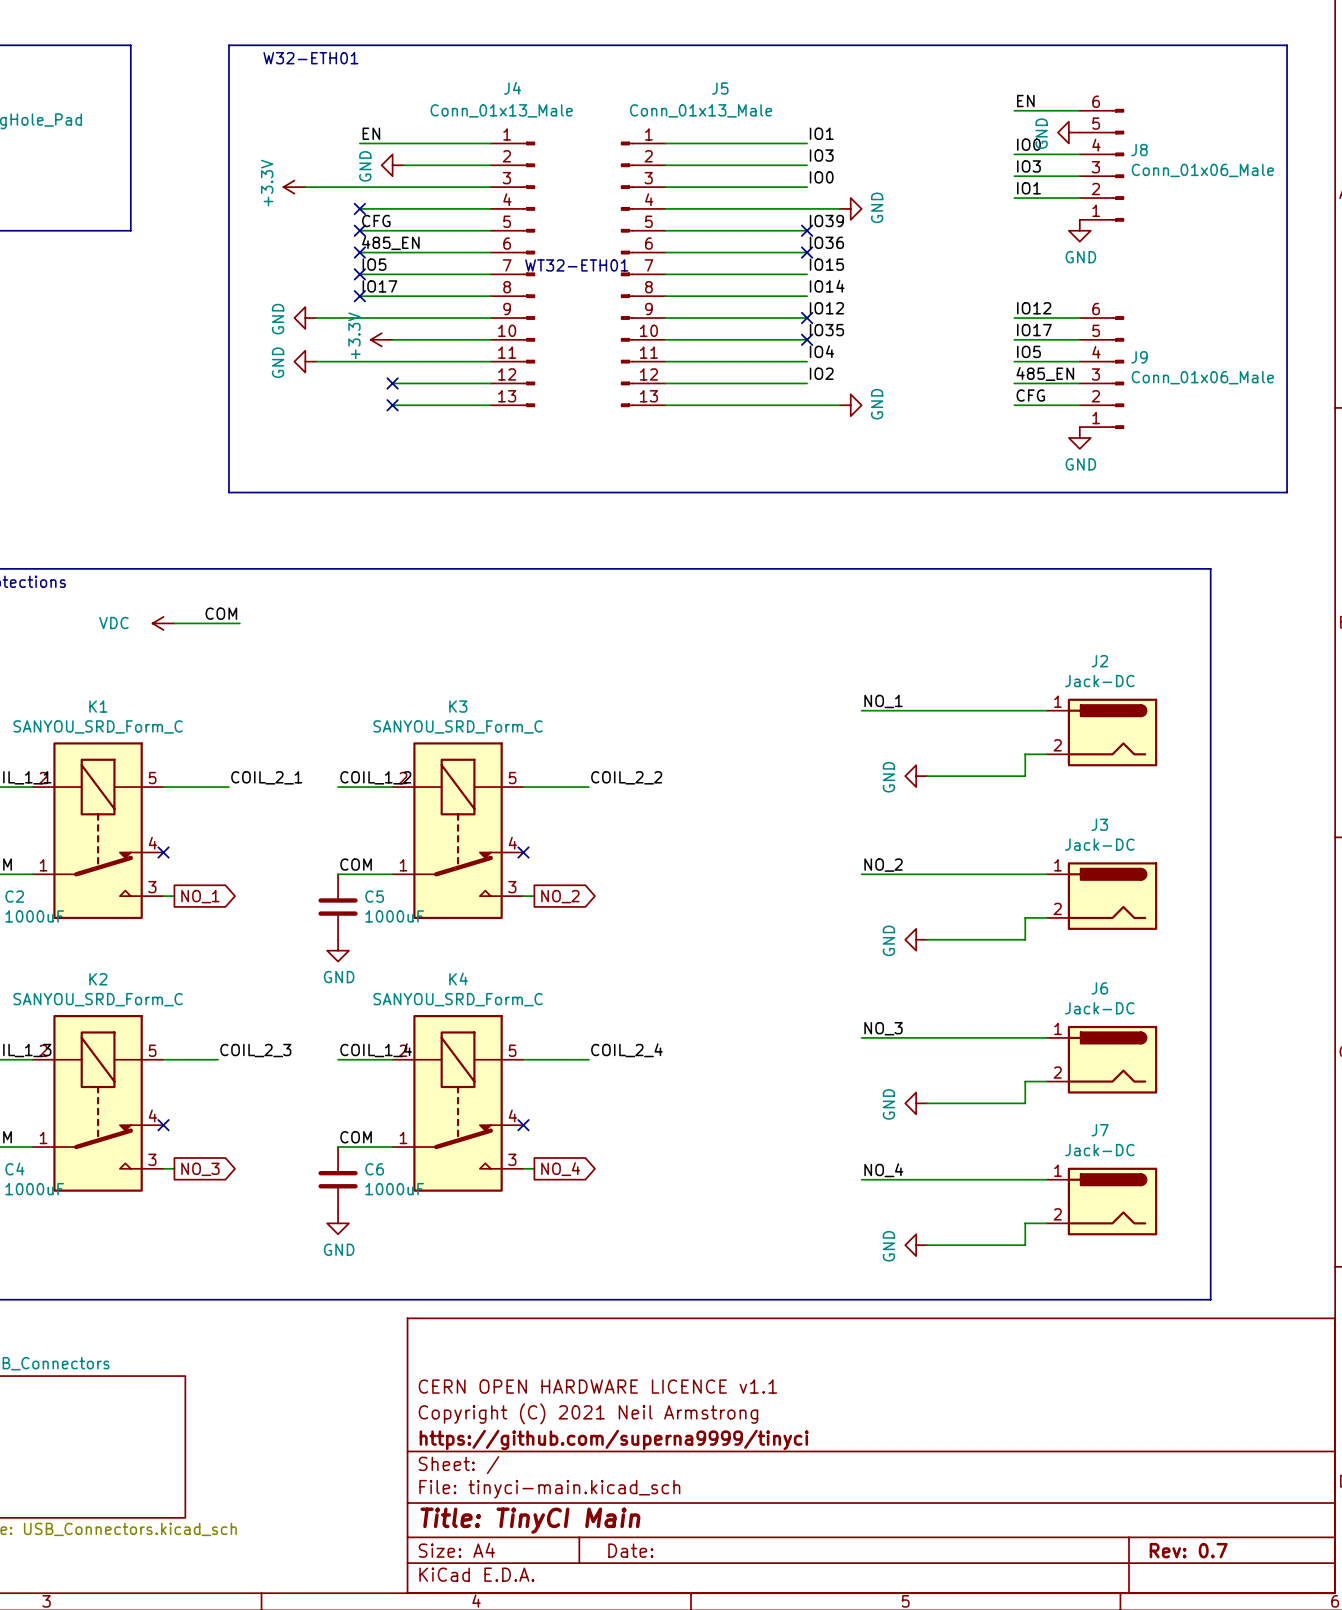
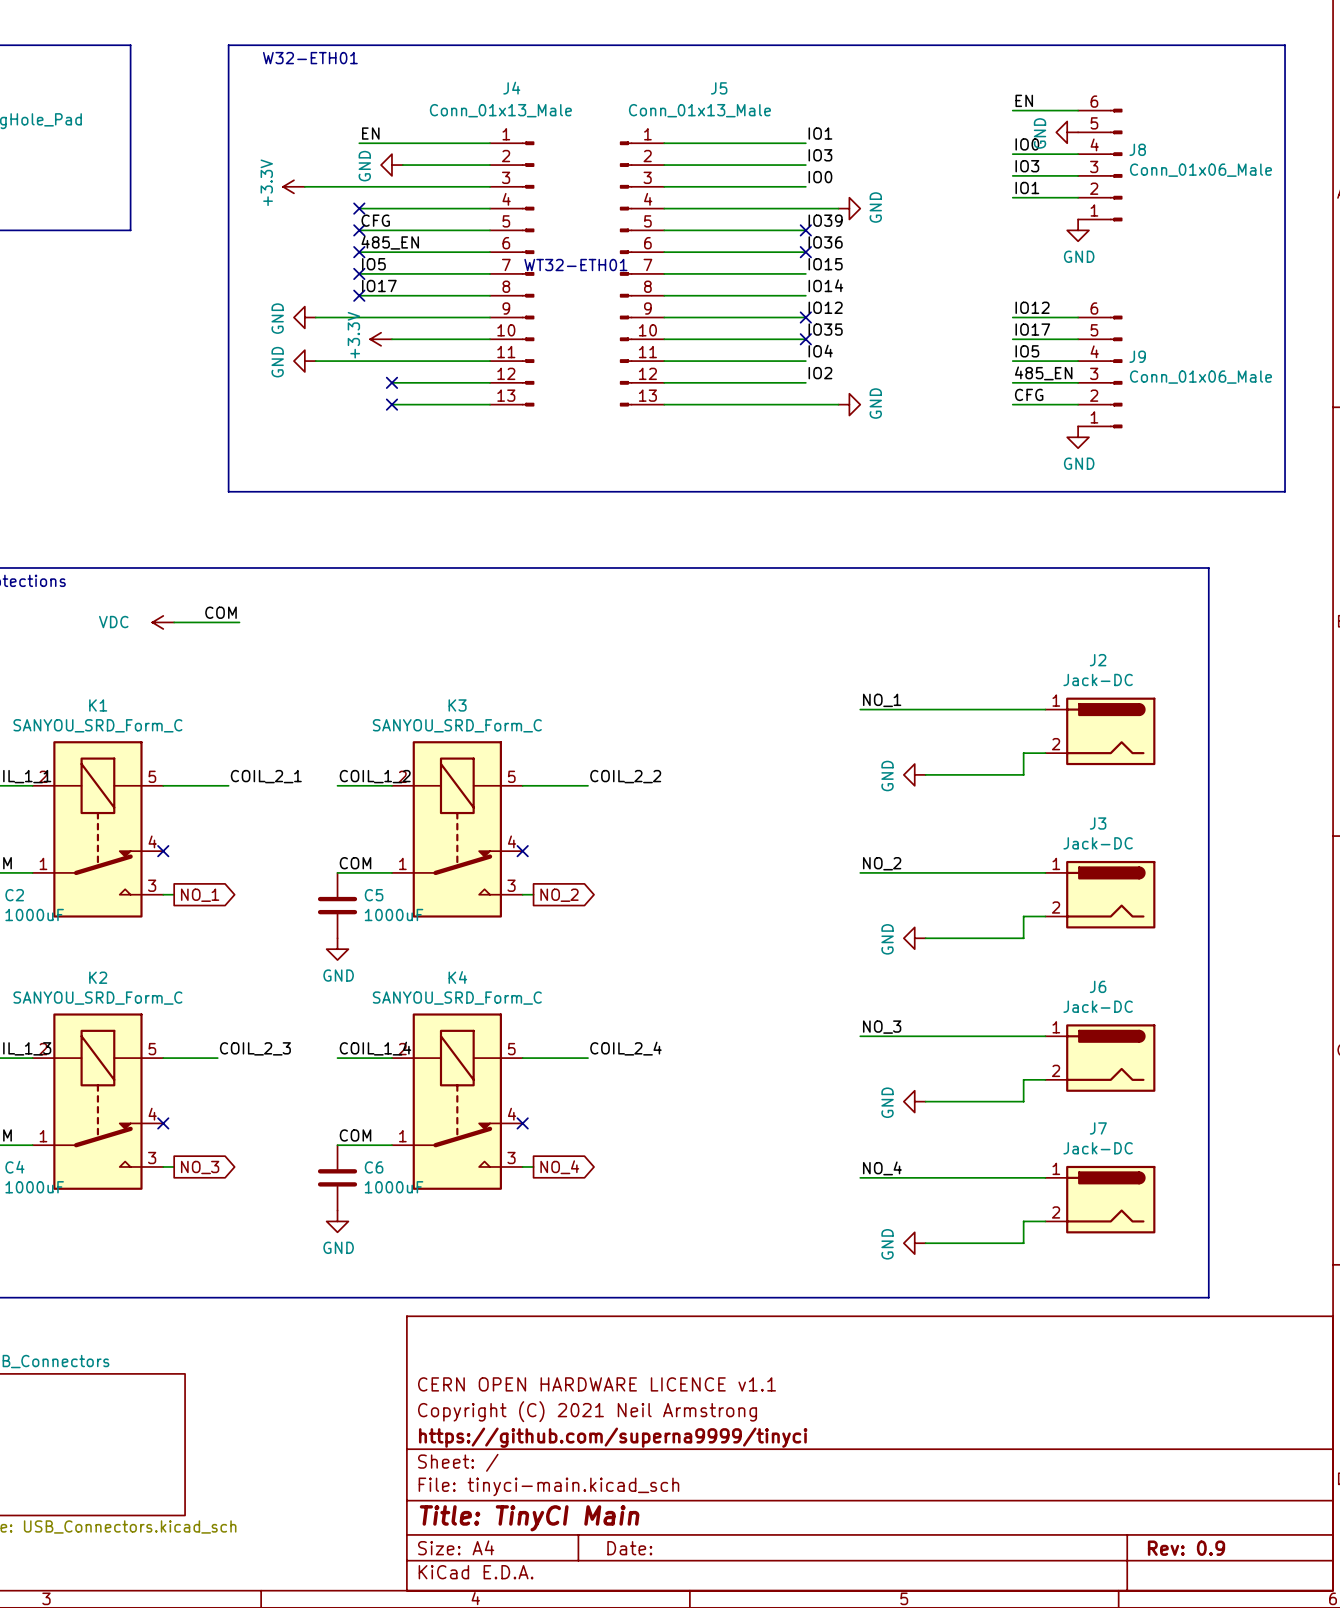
title block: Rev: 0.7 (1188, 1550) -> Rev: 0.9 (1186, 1548)

